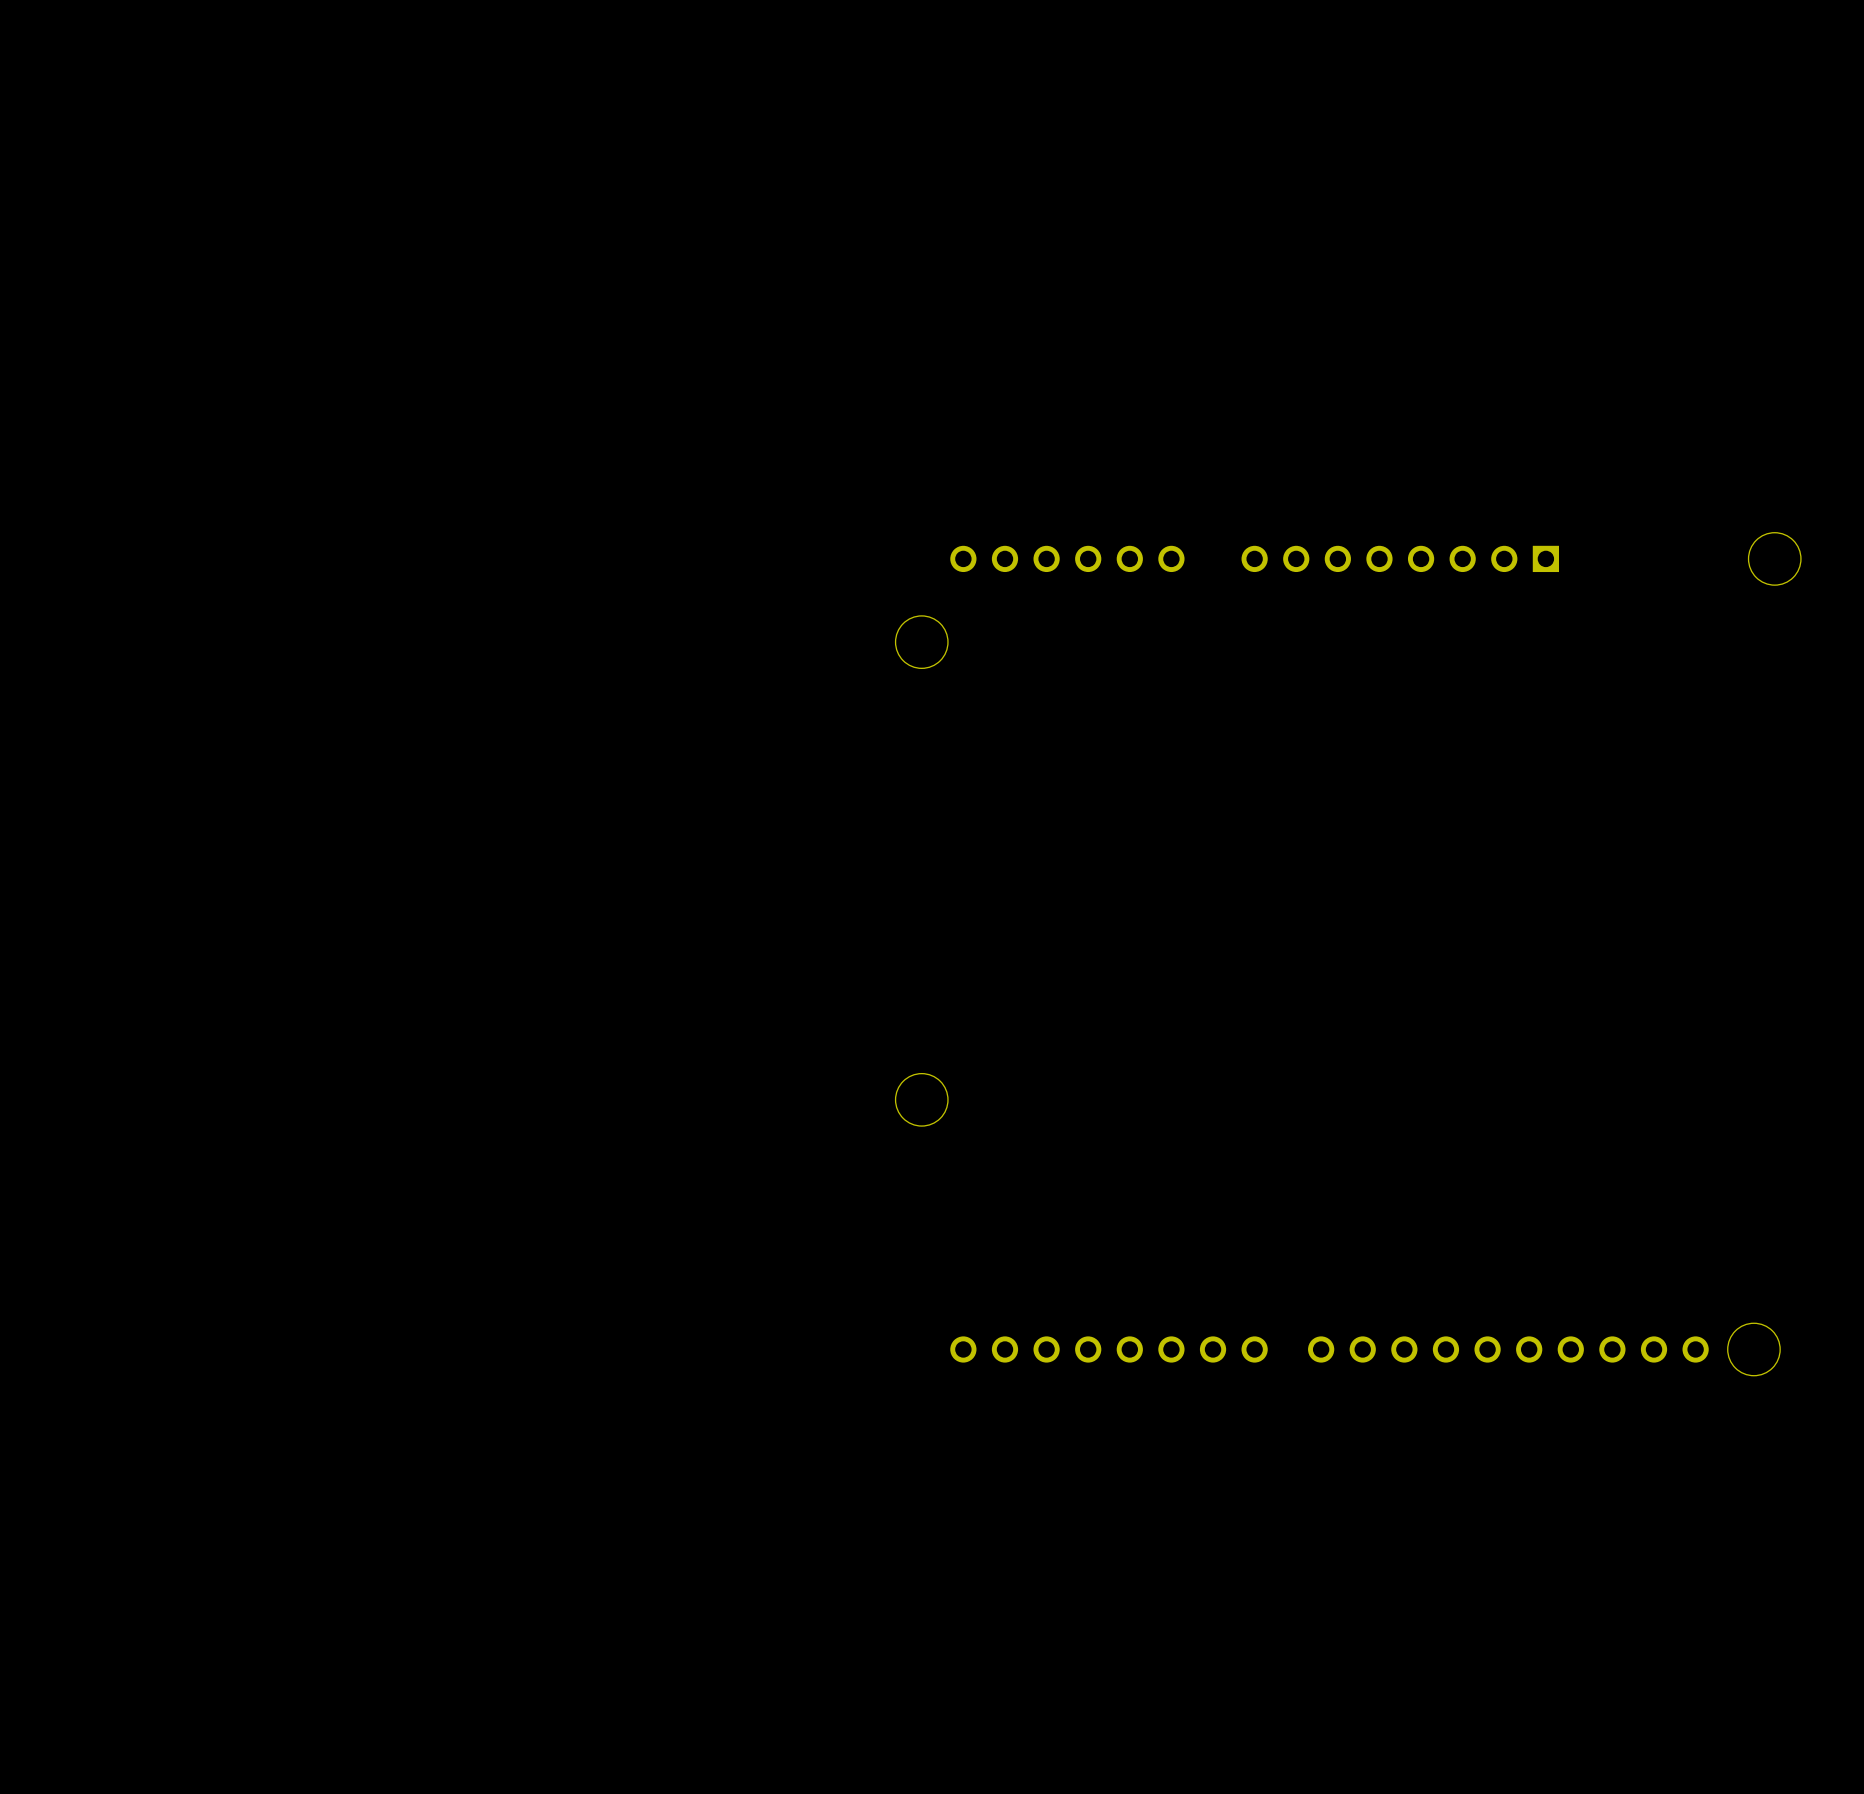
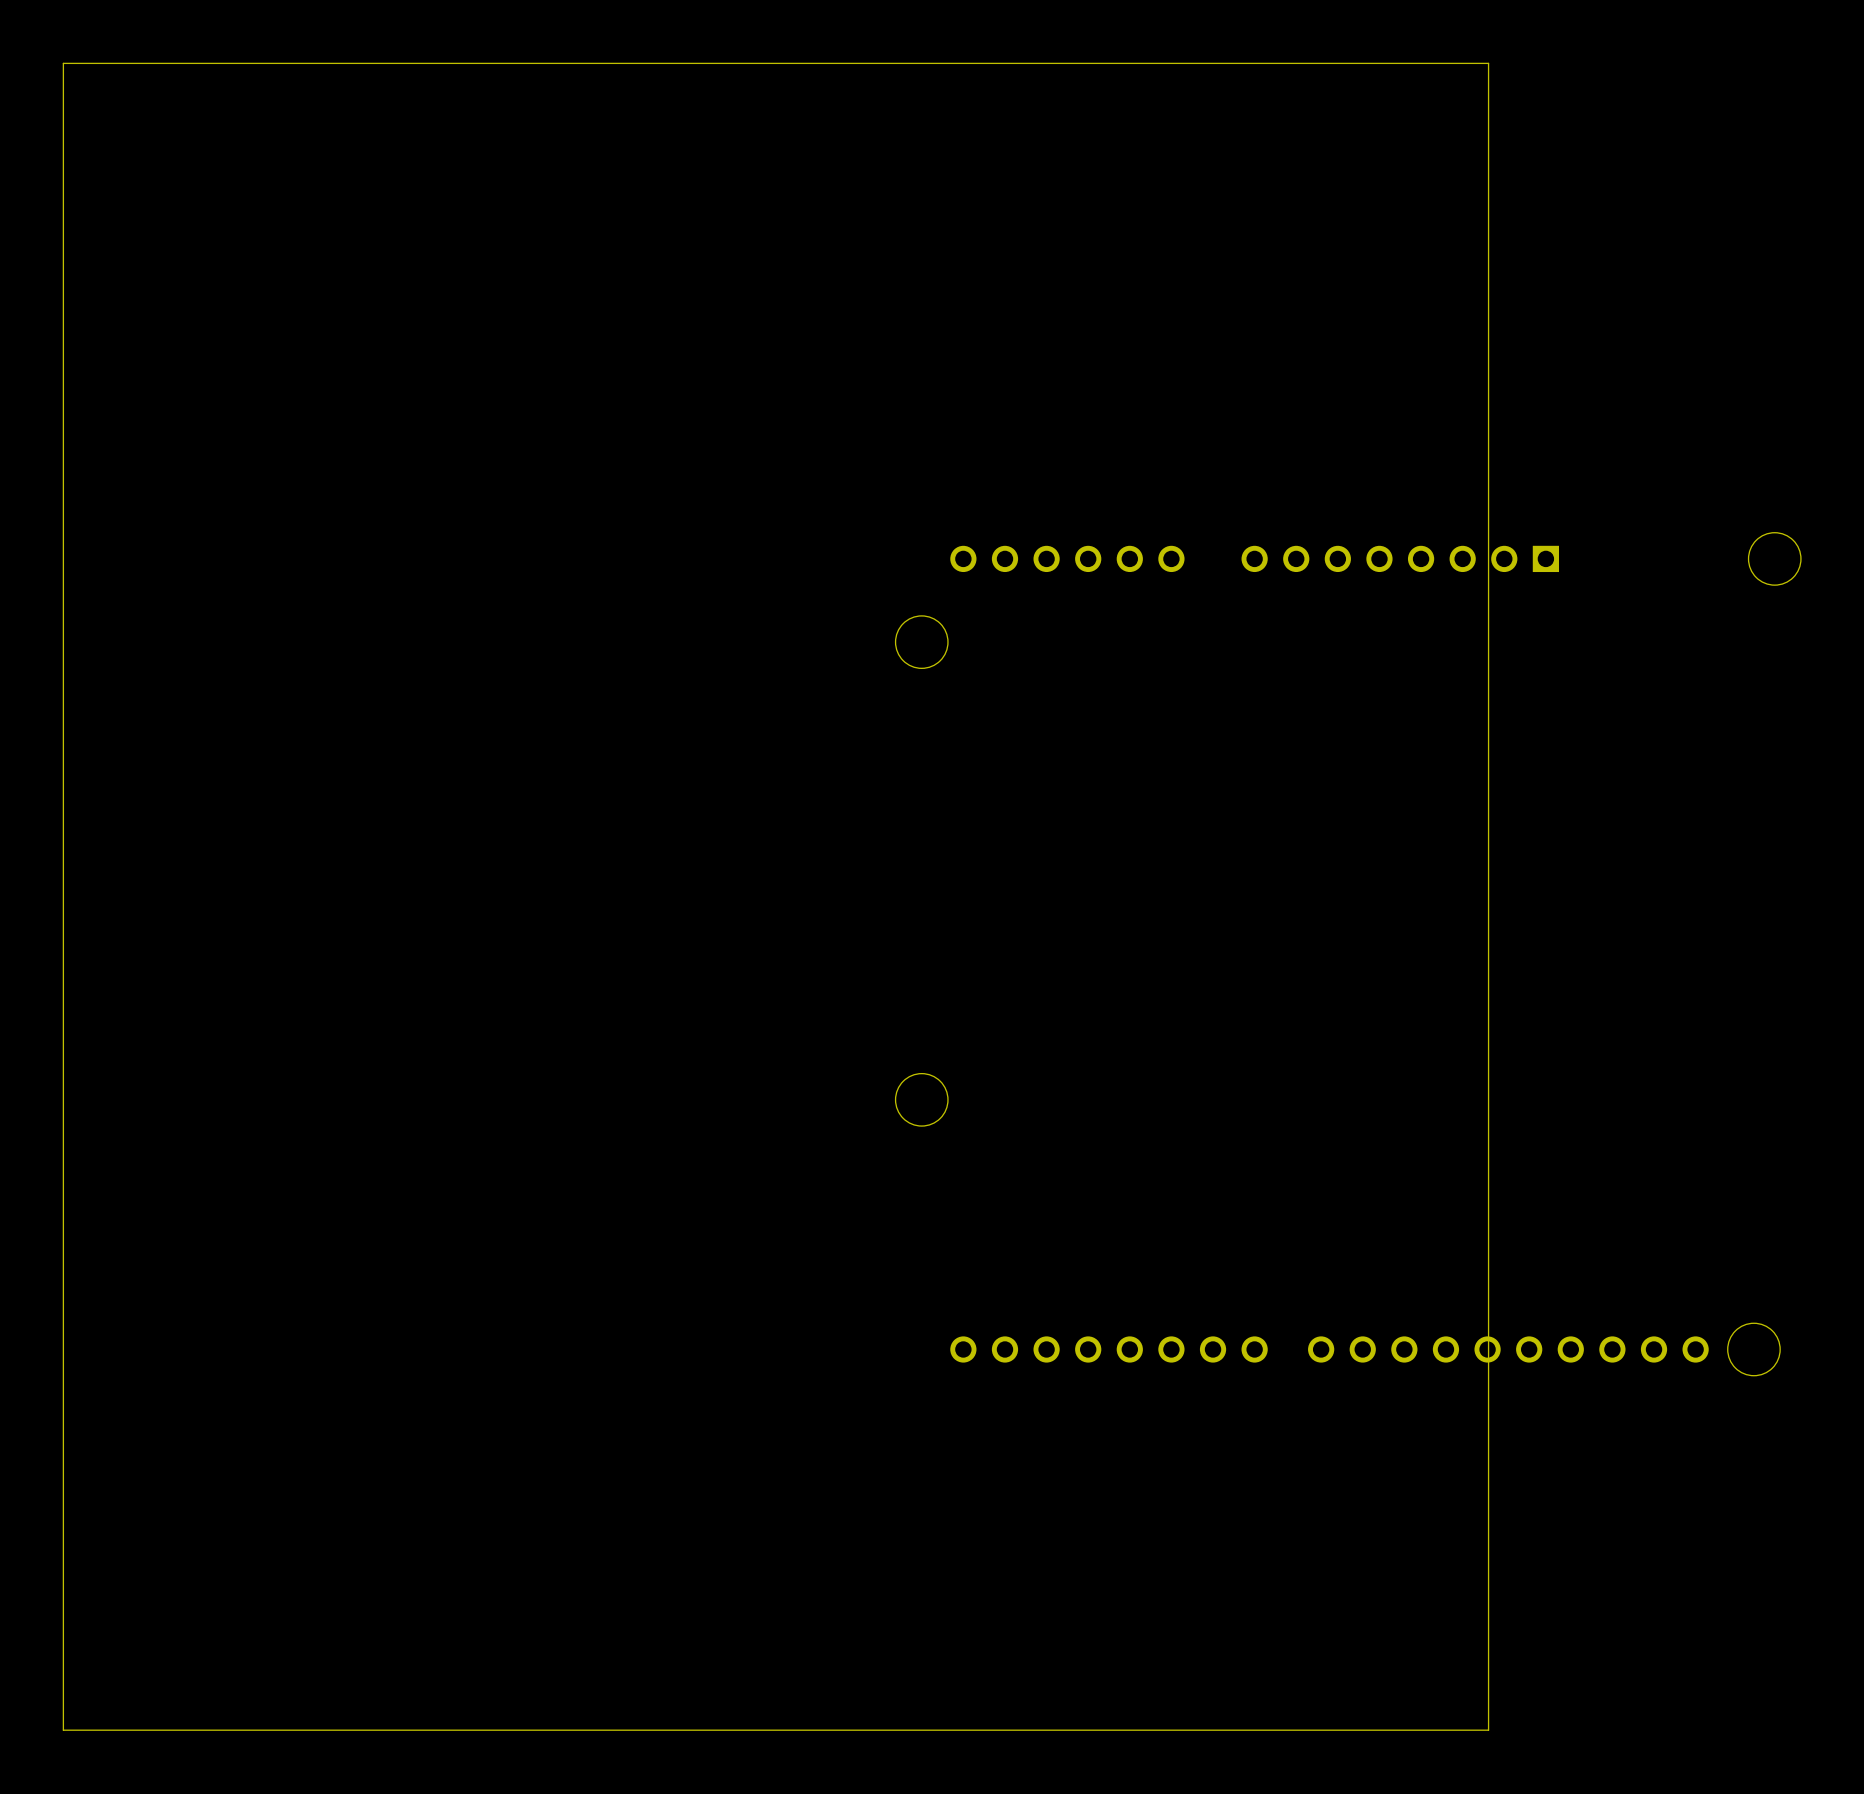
board edge: none -> (1488, 63) (63, 63) (63, 1730) (1488, 1730) (1488, 63)

